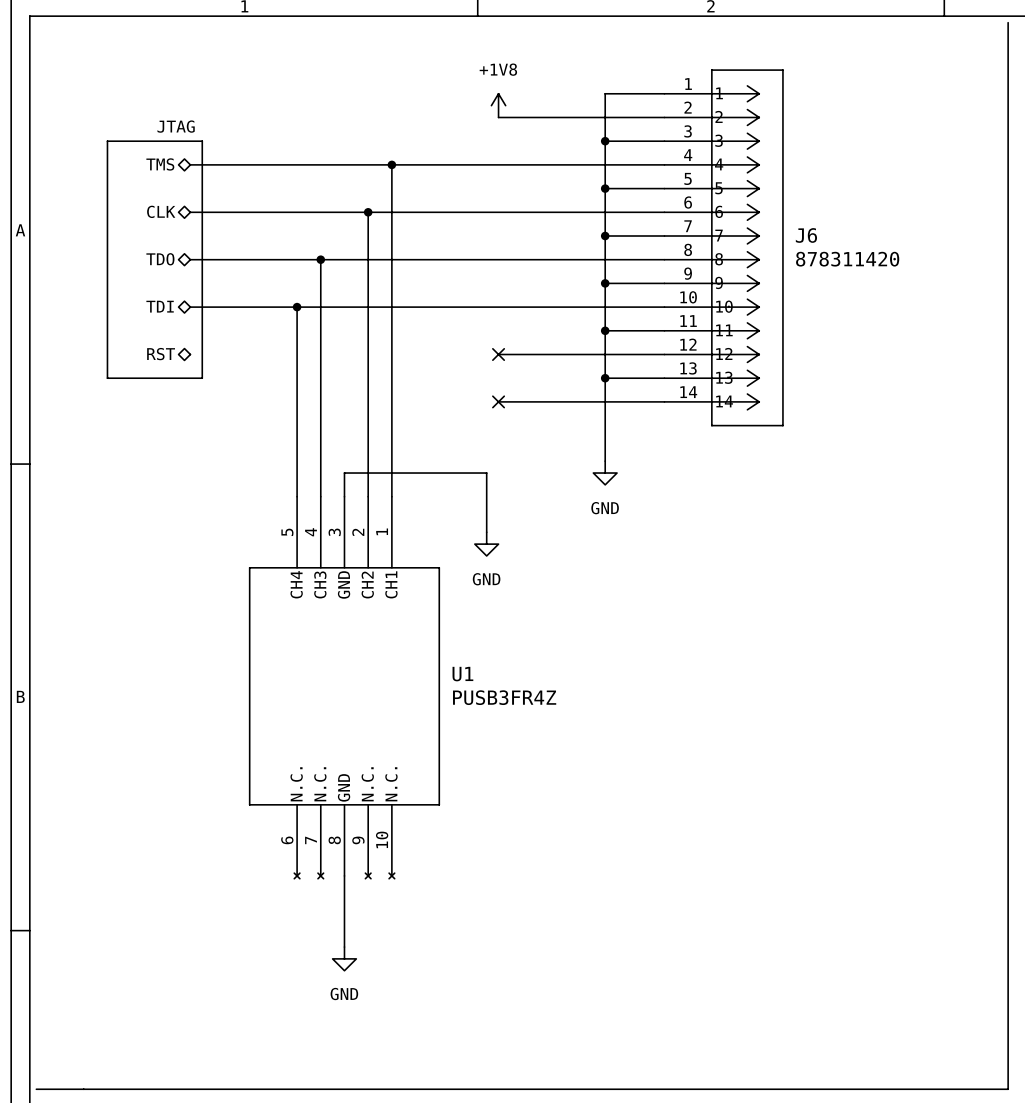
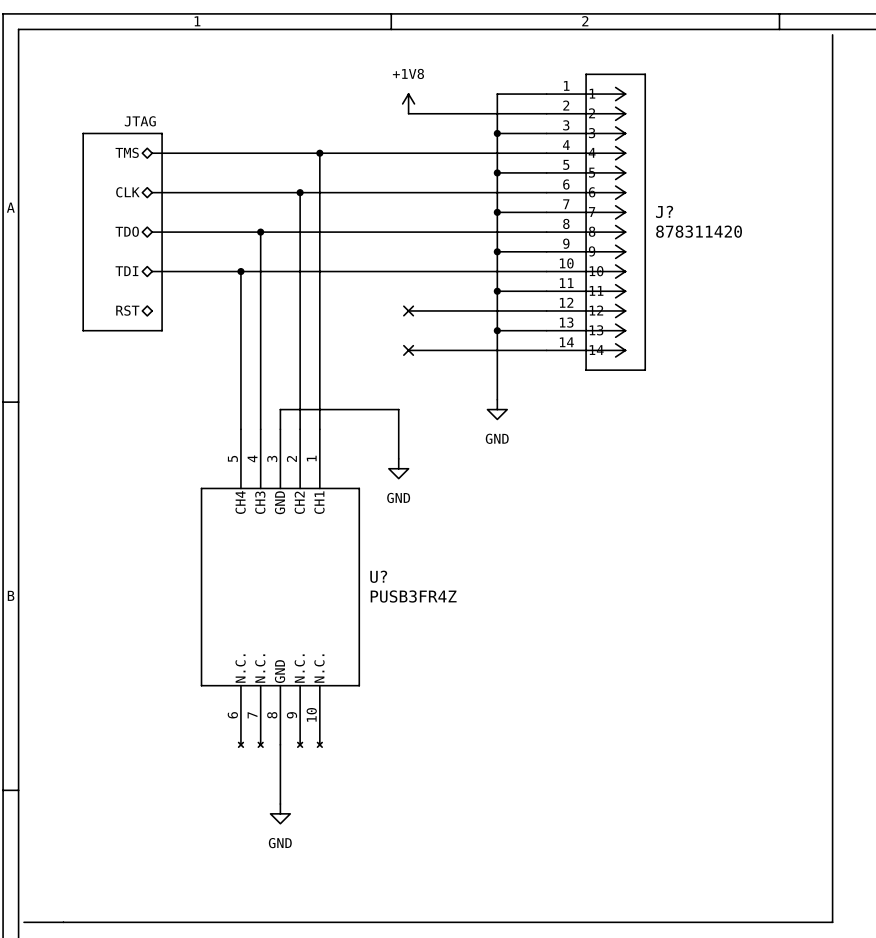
J6 name: J6 (806, 235) -> J? (664, 211)
U1 name: U1 (462, 674) -> U? (378, 576)

